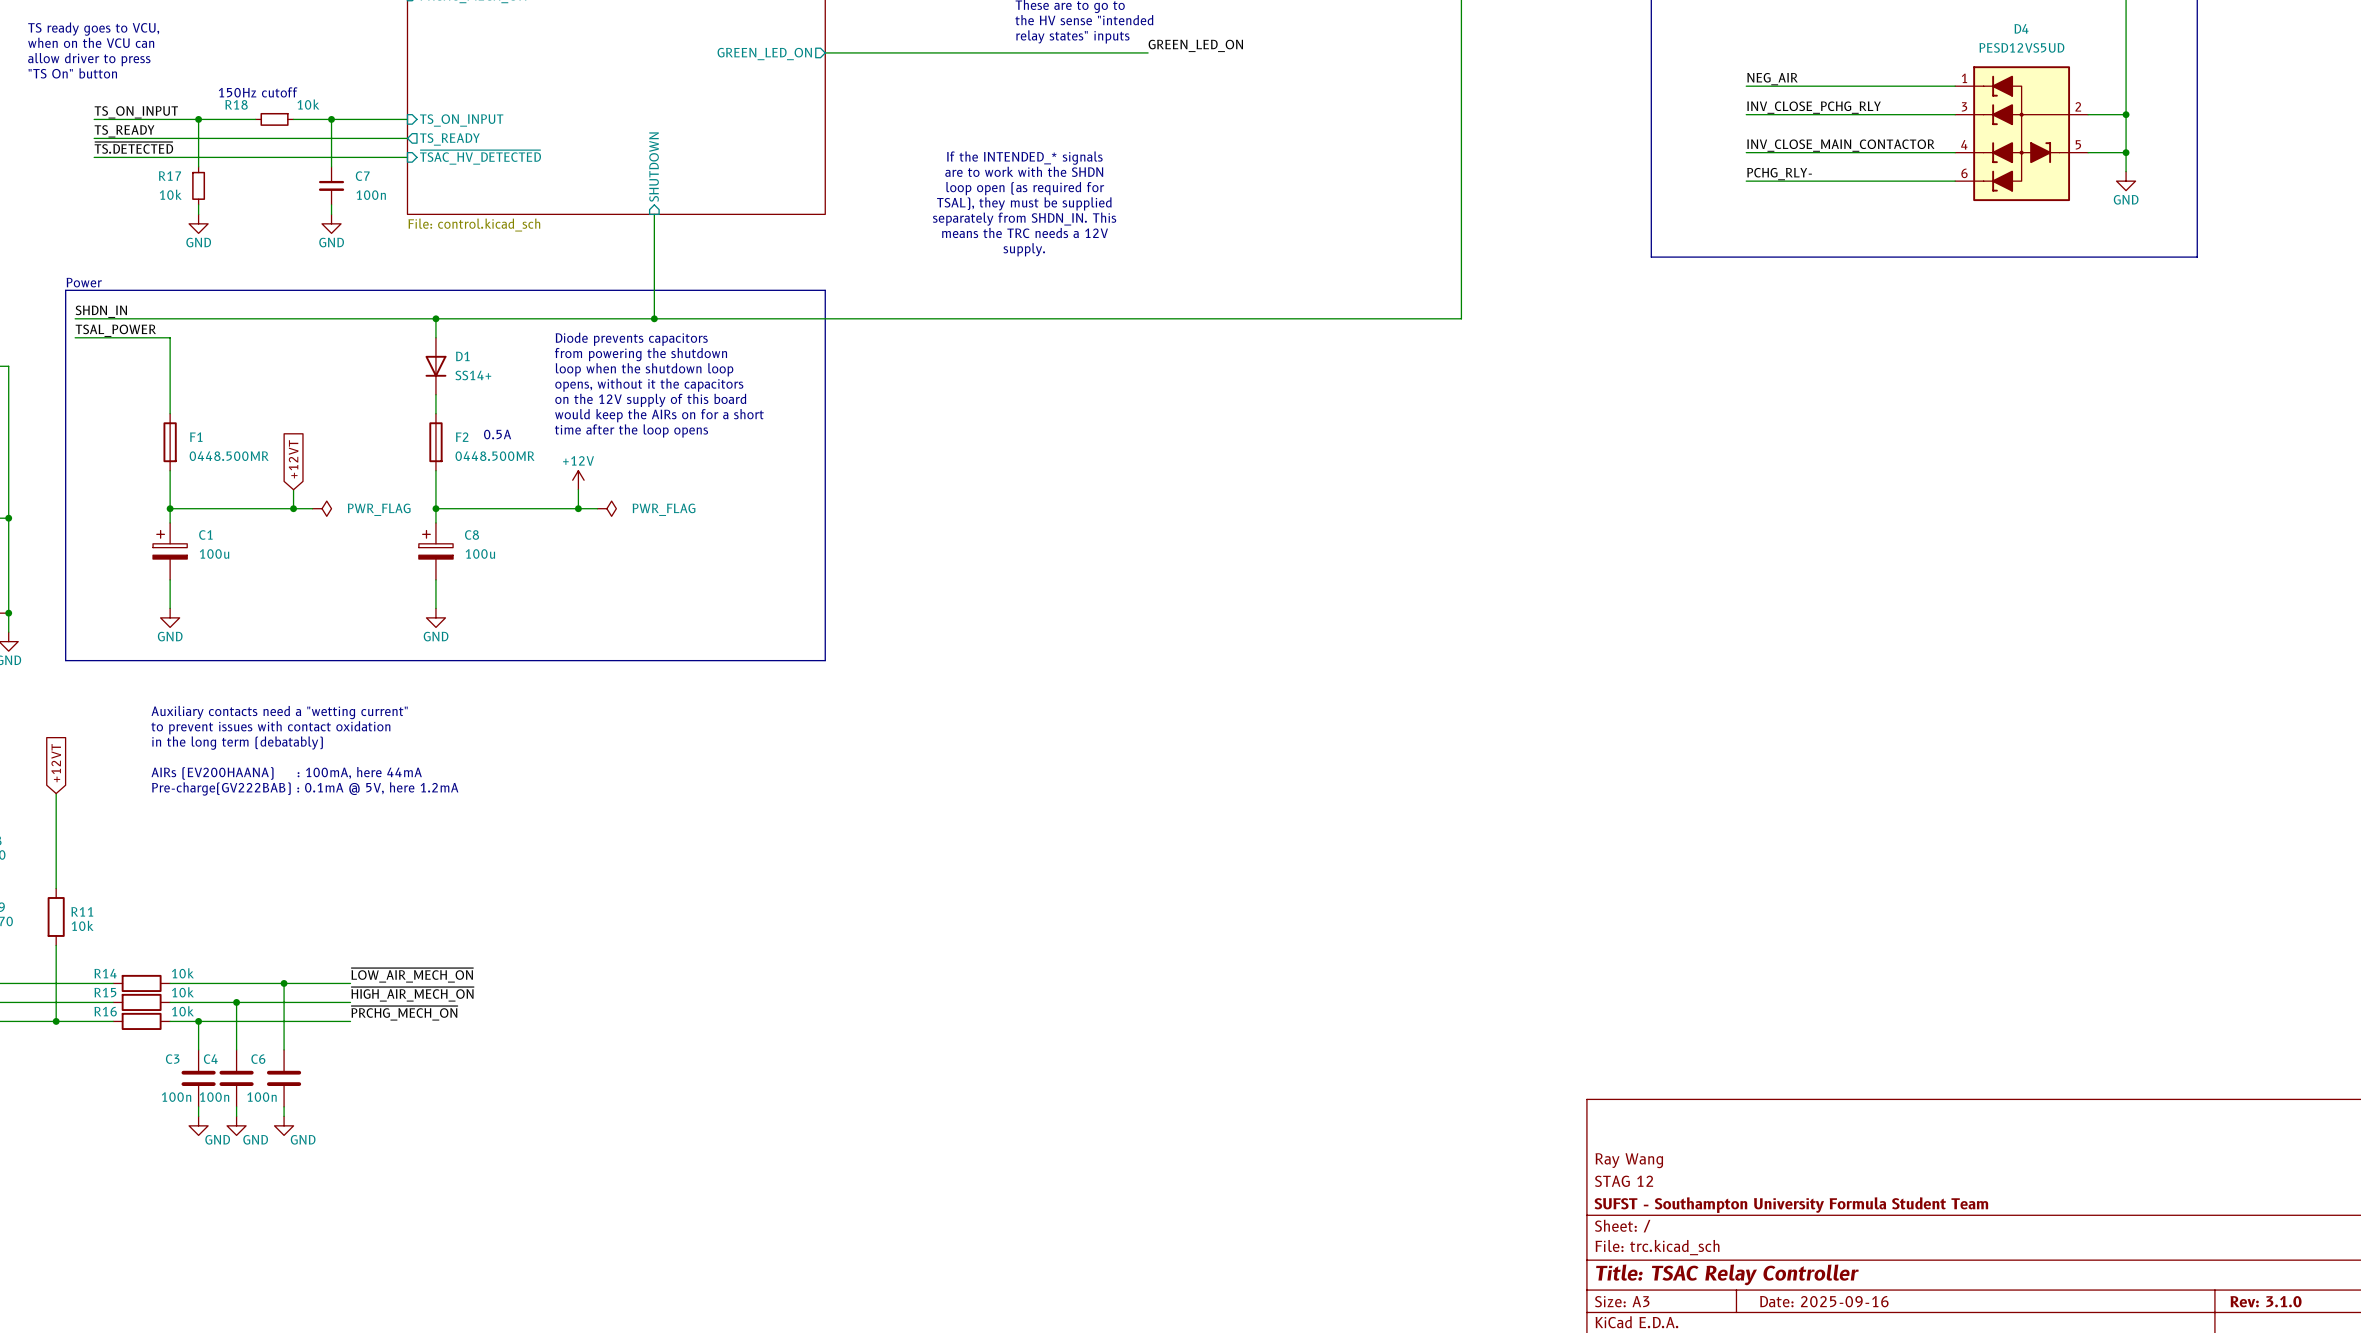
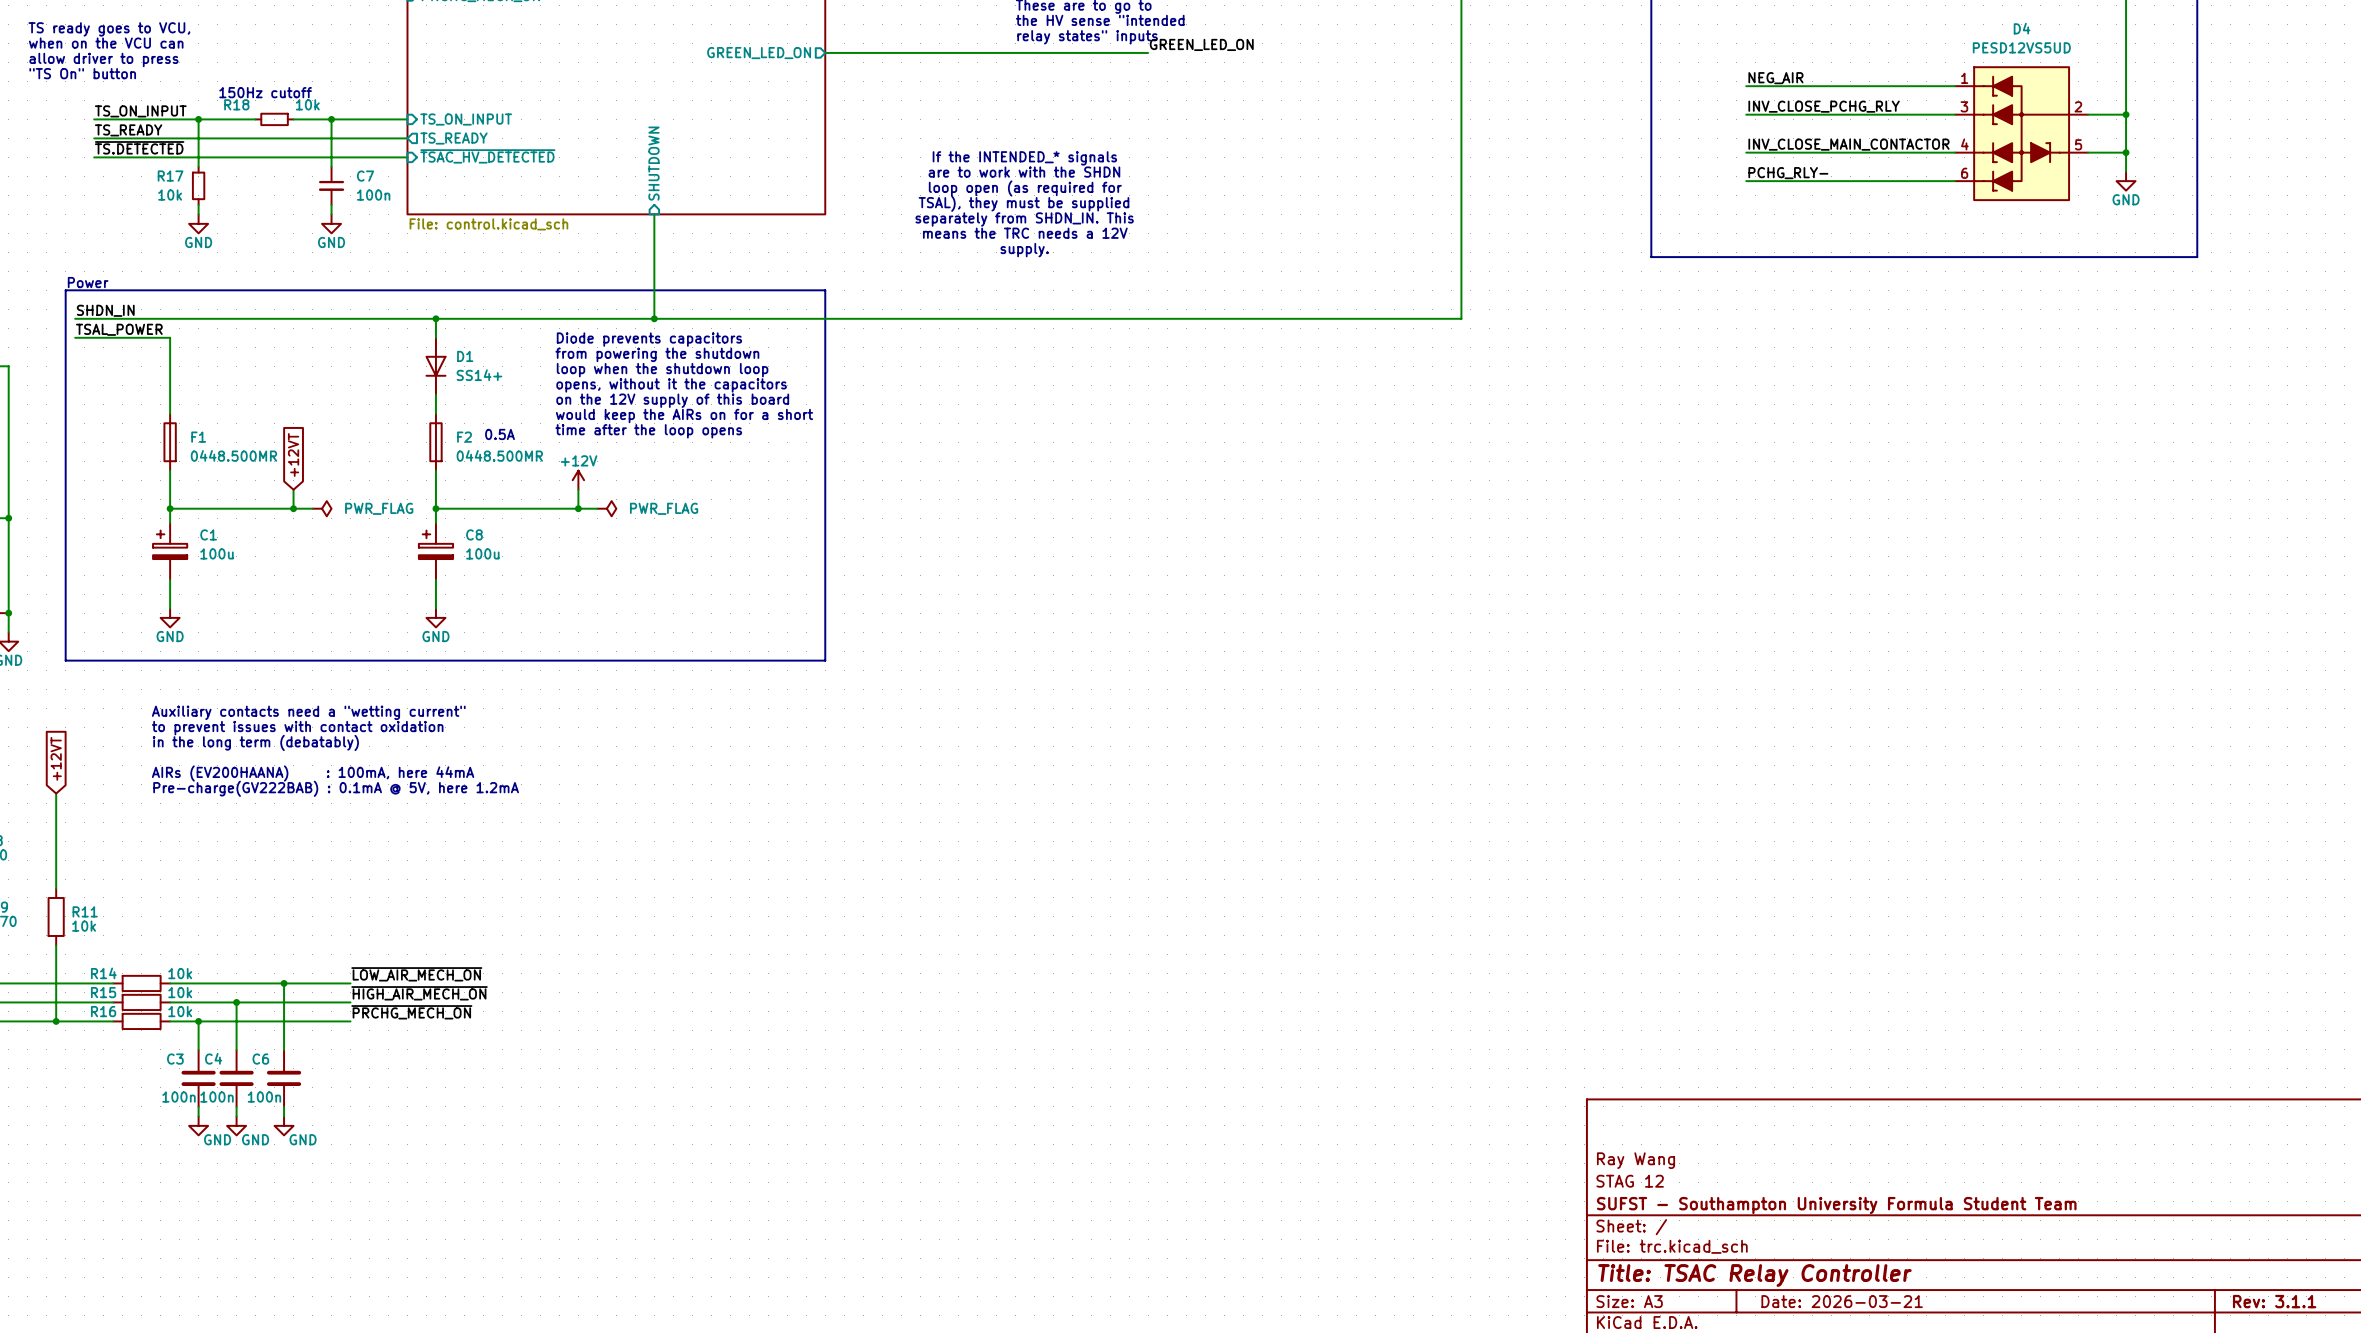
title block: Date: 2025-09-16 (1824, 1301) -> Date: 2026-03-21 (1842, 1301)
title block: Rev: 3.1.0 (2266, 1301) -> Rev: 3.1.1 (2274, 1301)

